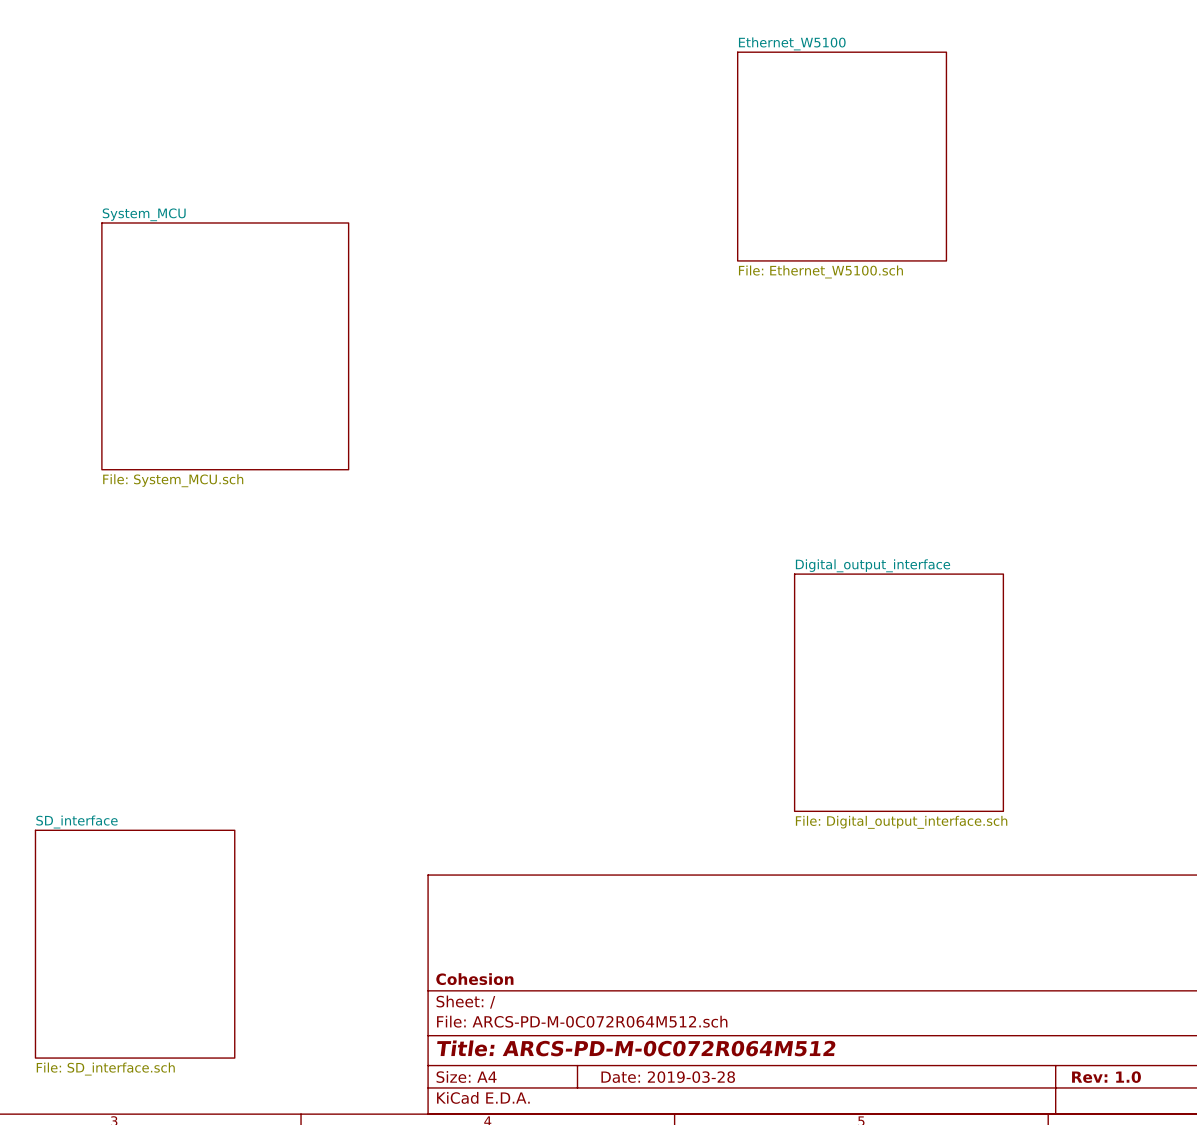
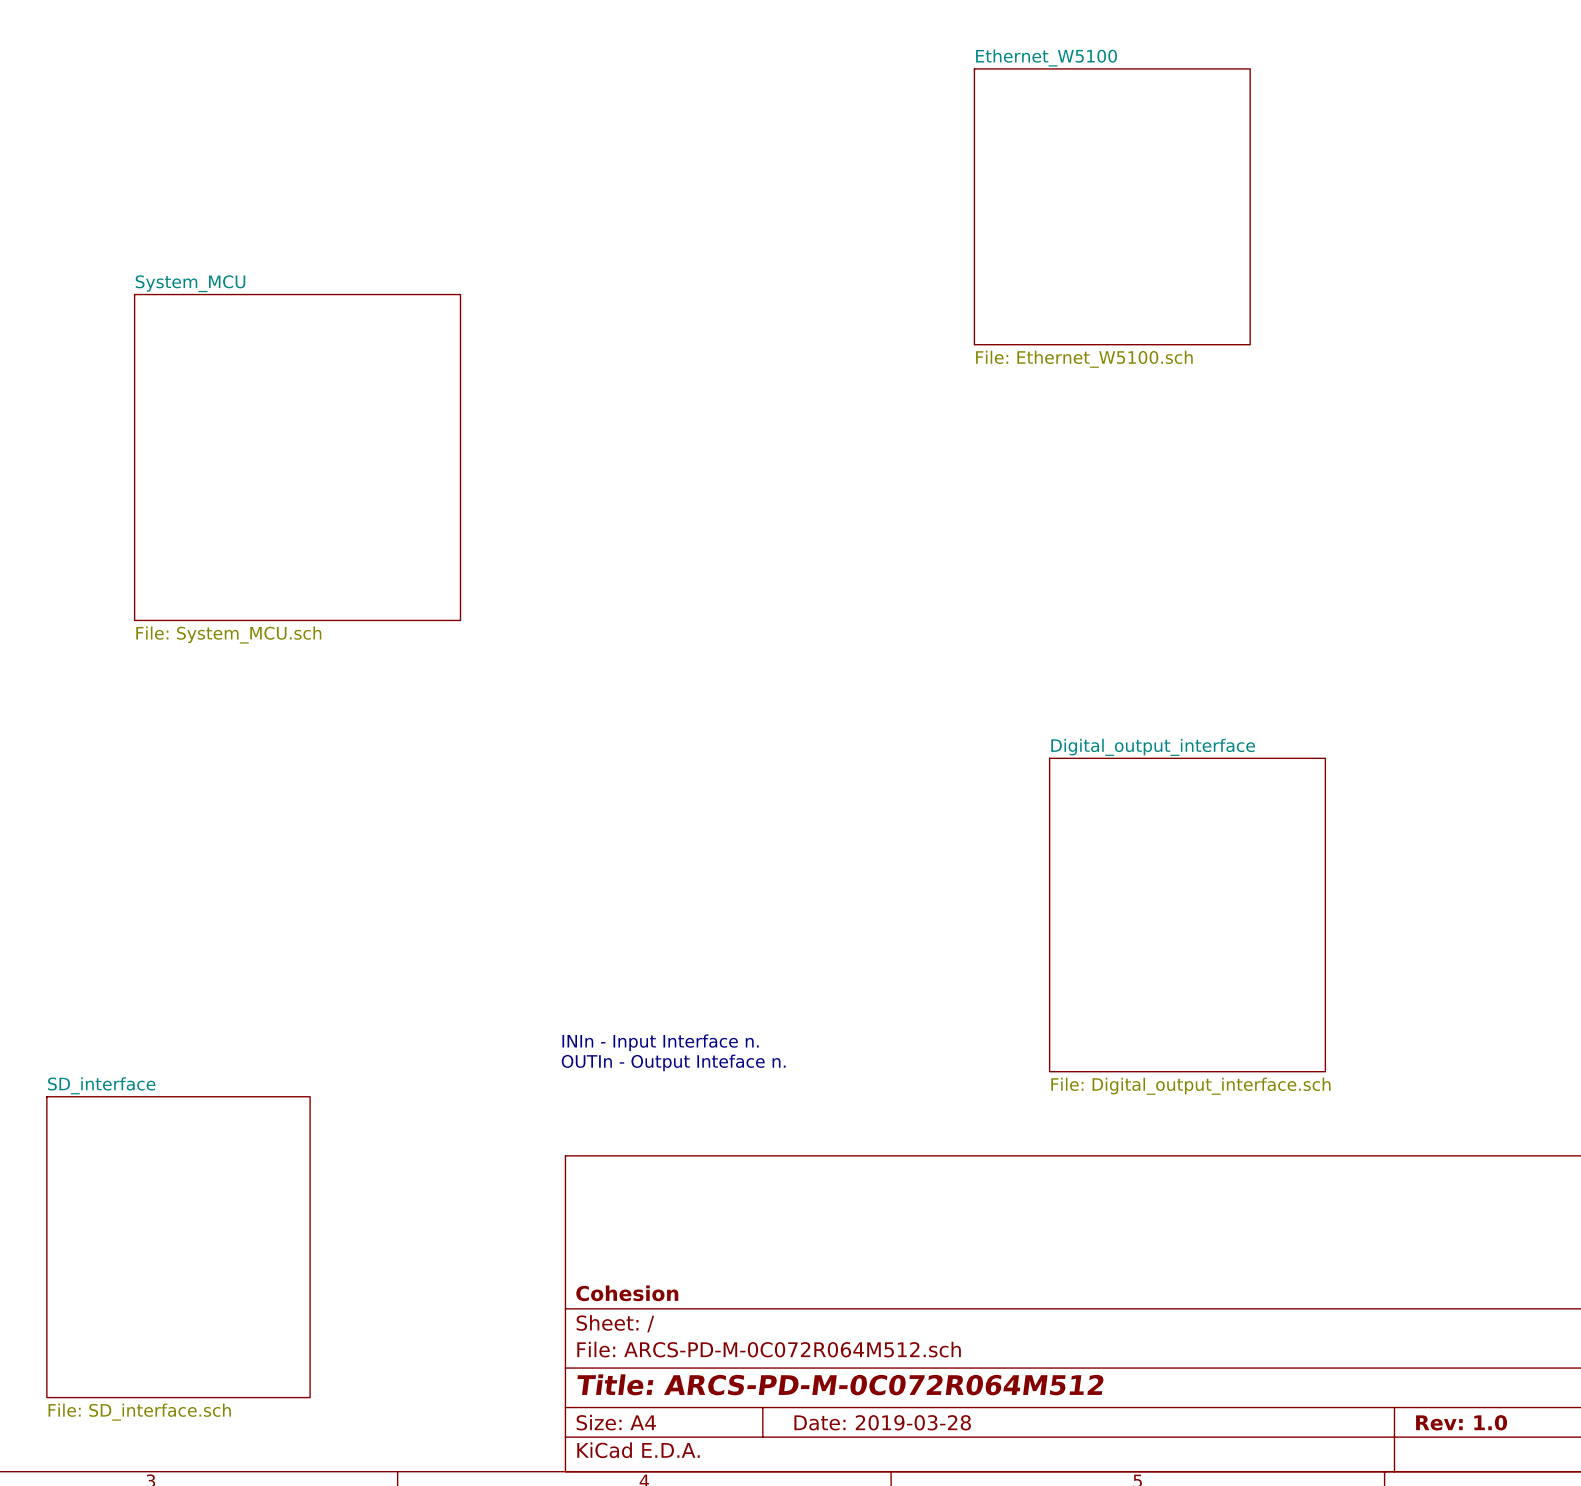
text: none -> INIn - Input Interface n. (660, 1042)
text: none -> OUTIn - Output Inteface n. (673, 1062)

